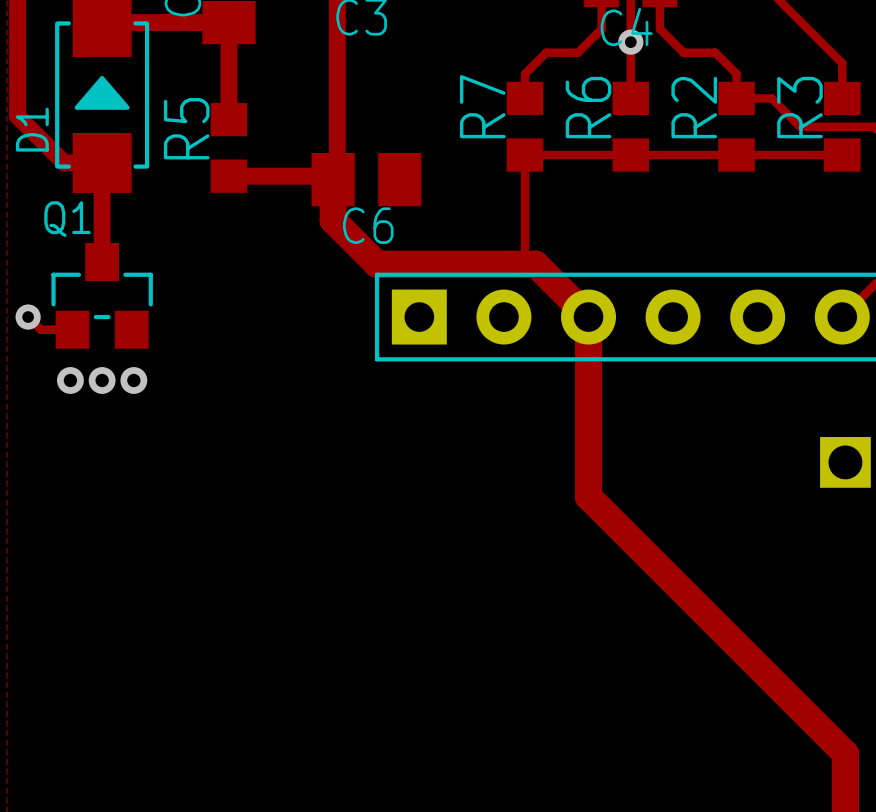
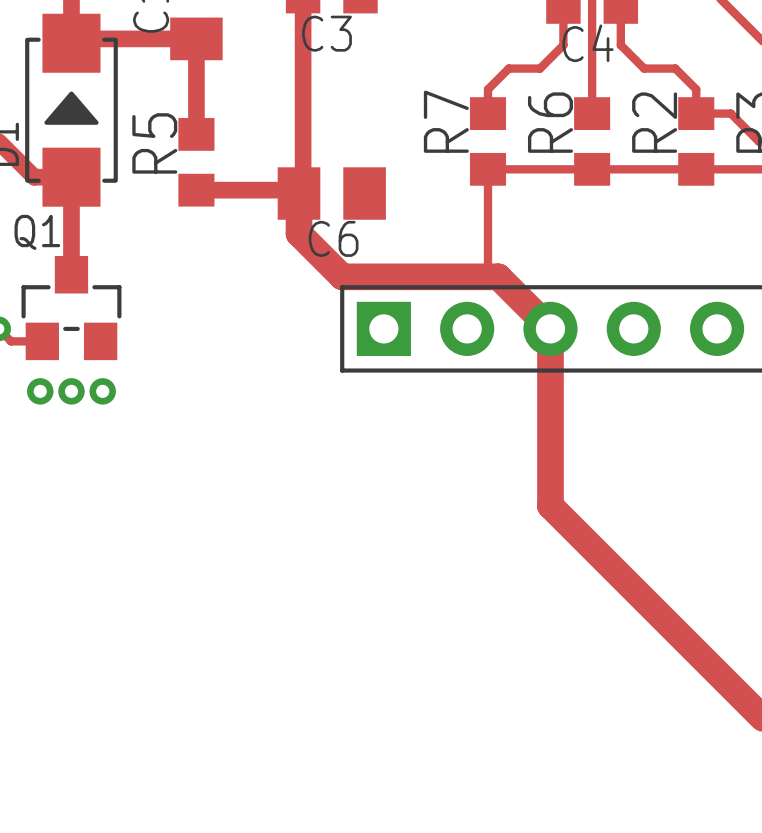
via: (630, 42) -> none

